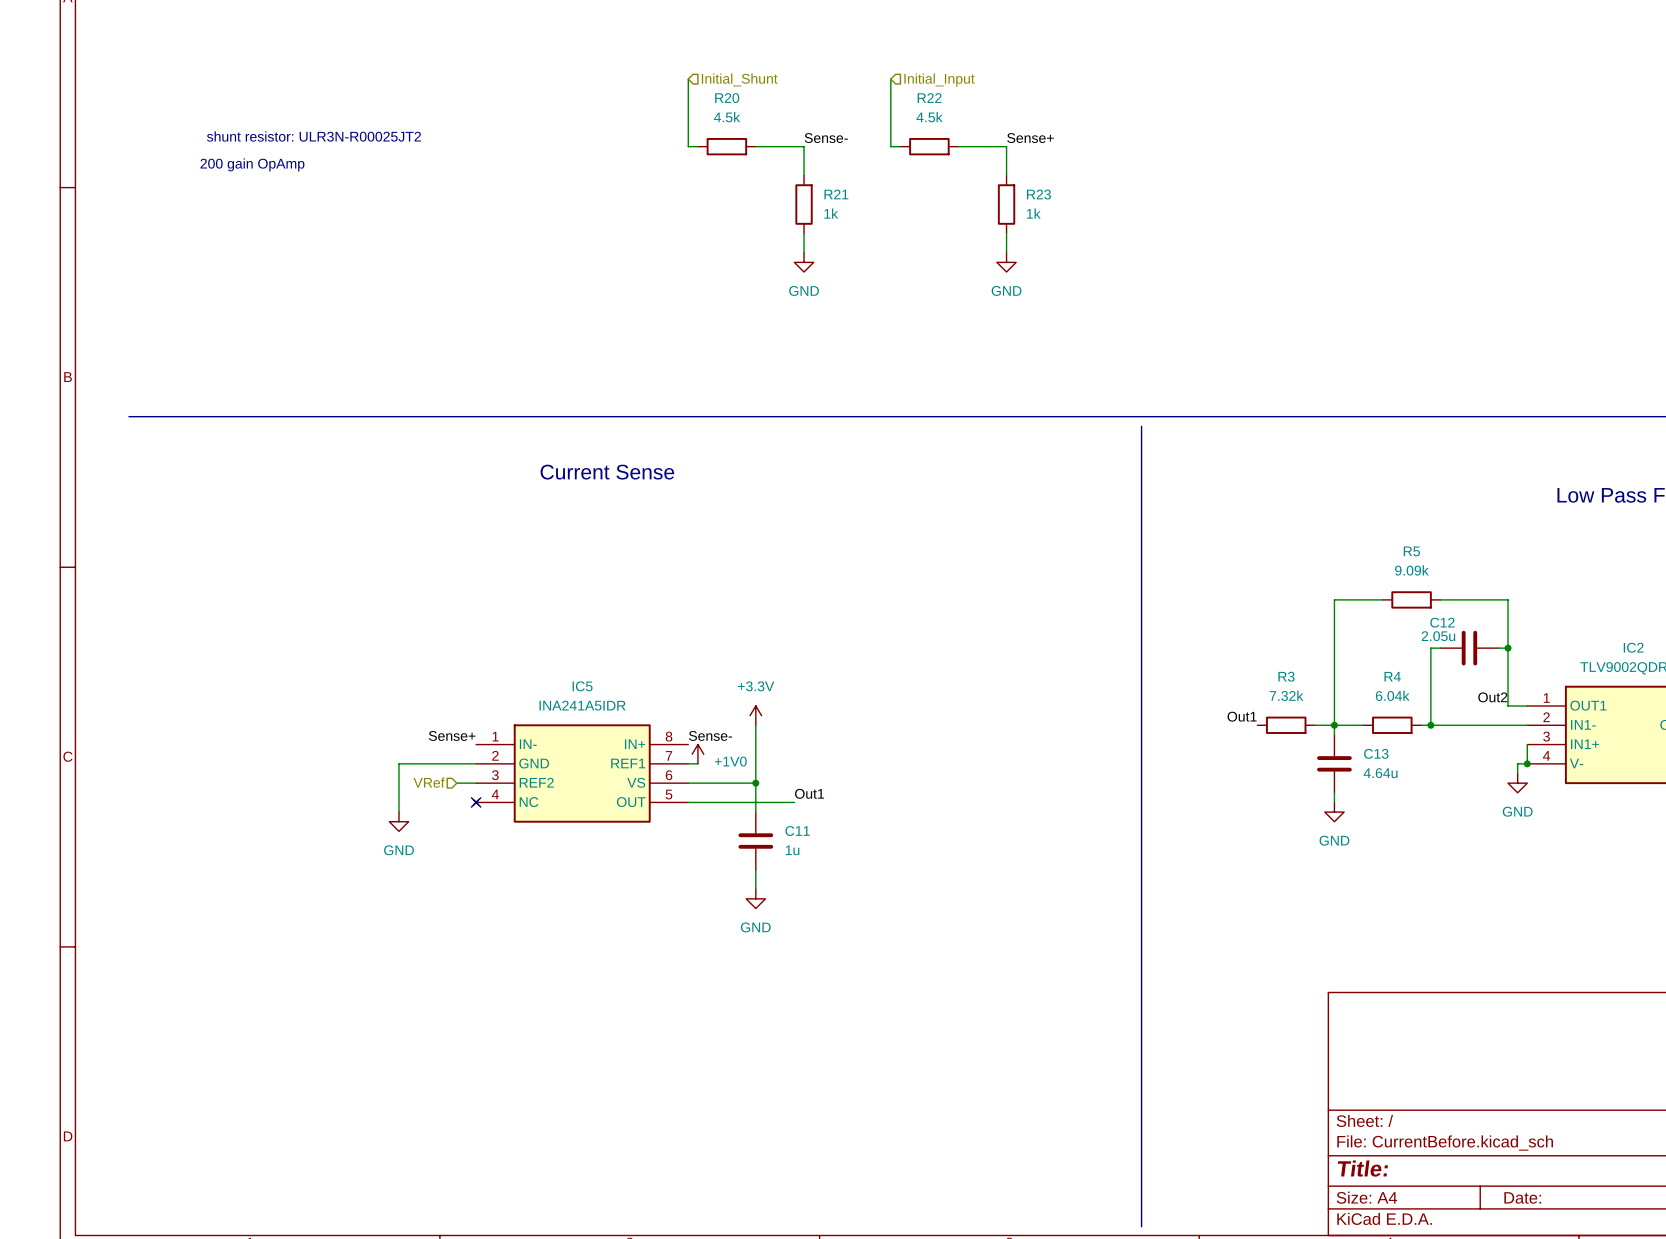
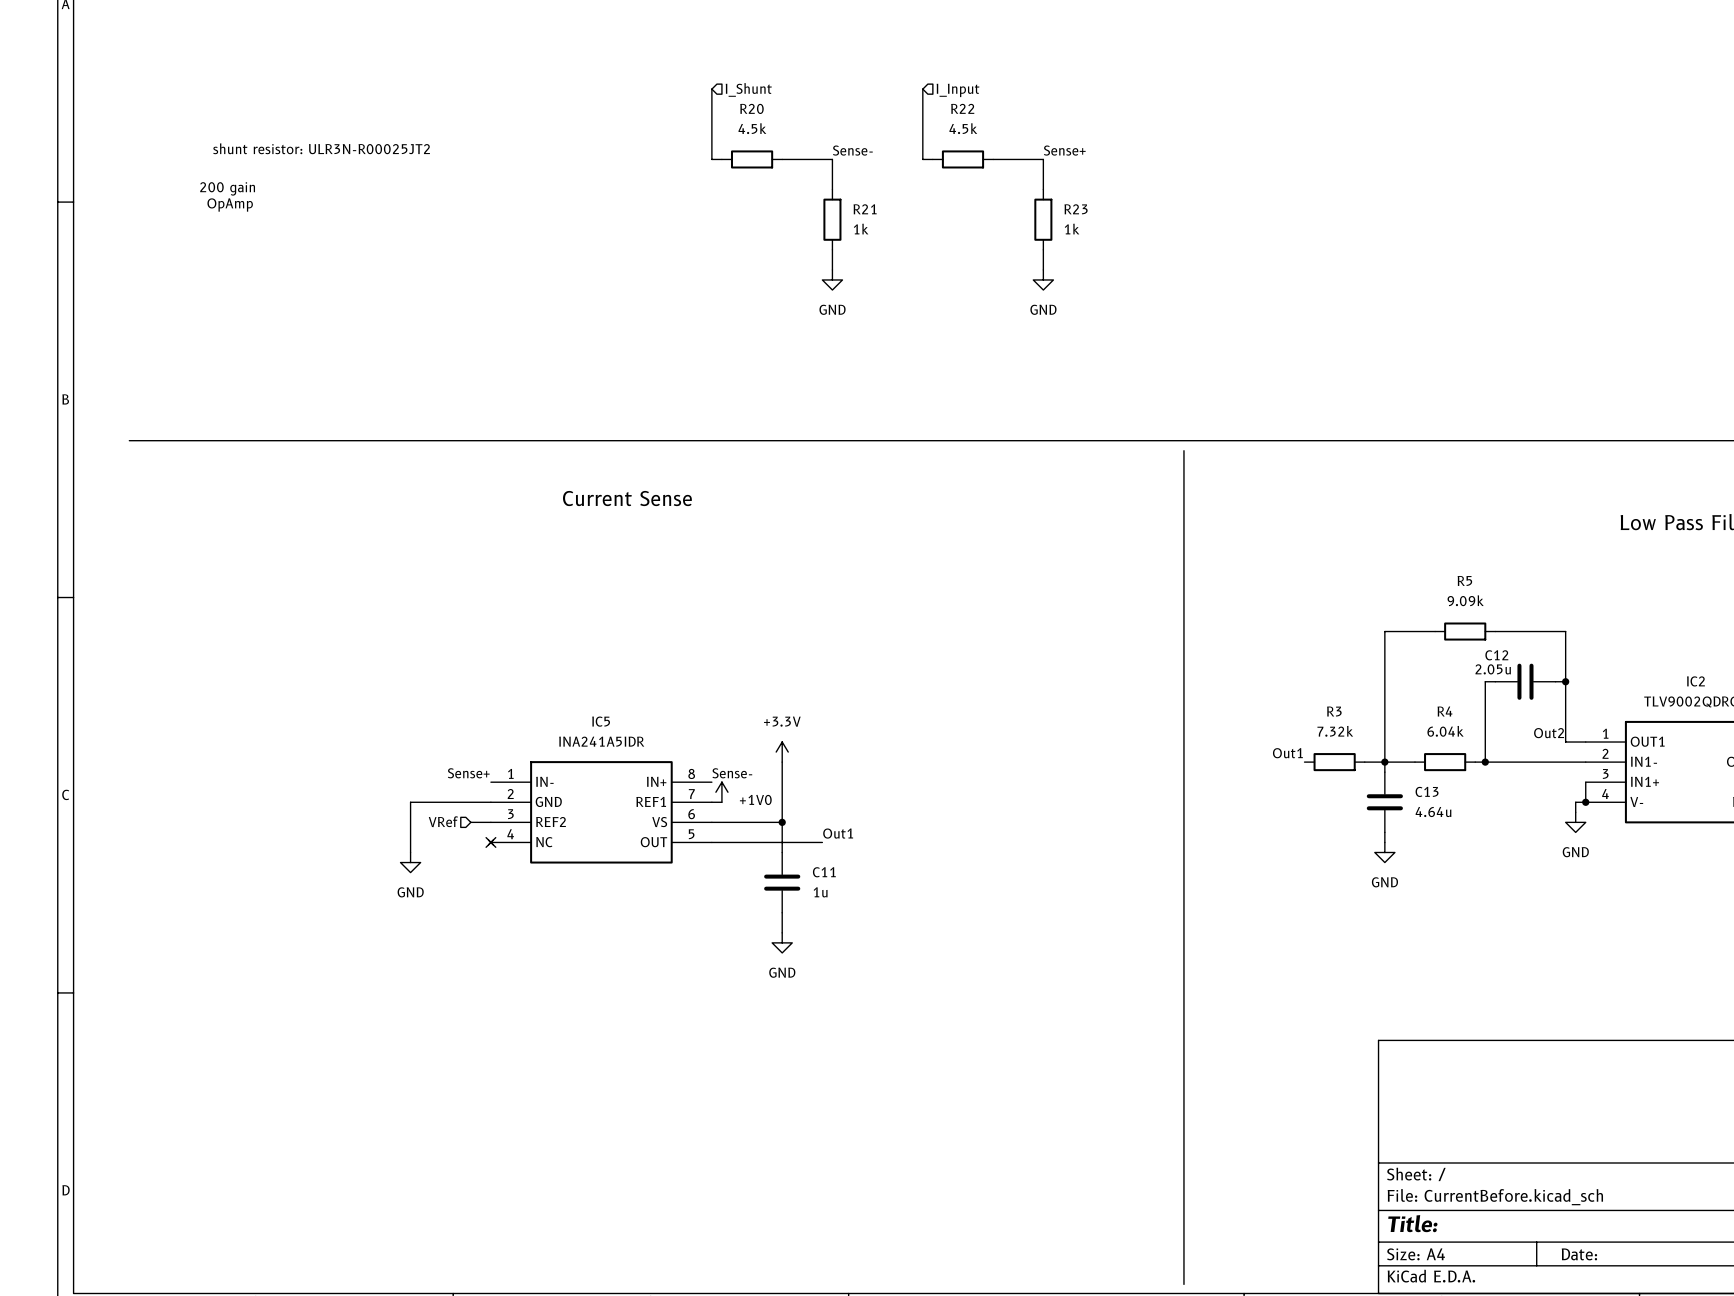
hierarchical label: Initial_Shunt (739, 79) -> I_Shunt (748, 89)
hierarchical label: Initial_Input (939, 79) -> I_Input (958, 90)
text: 200 gain OpAmp (252, 164) -> 200 gain (227, 188)
text: none -> OpAmp (230, 205)

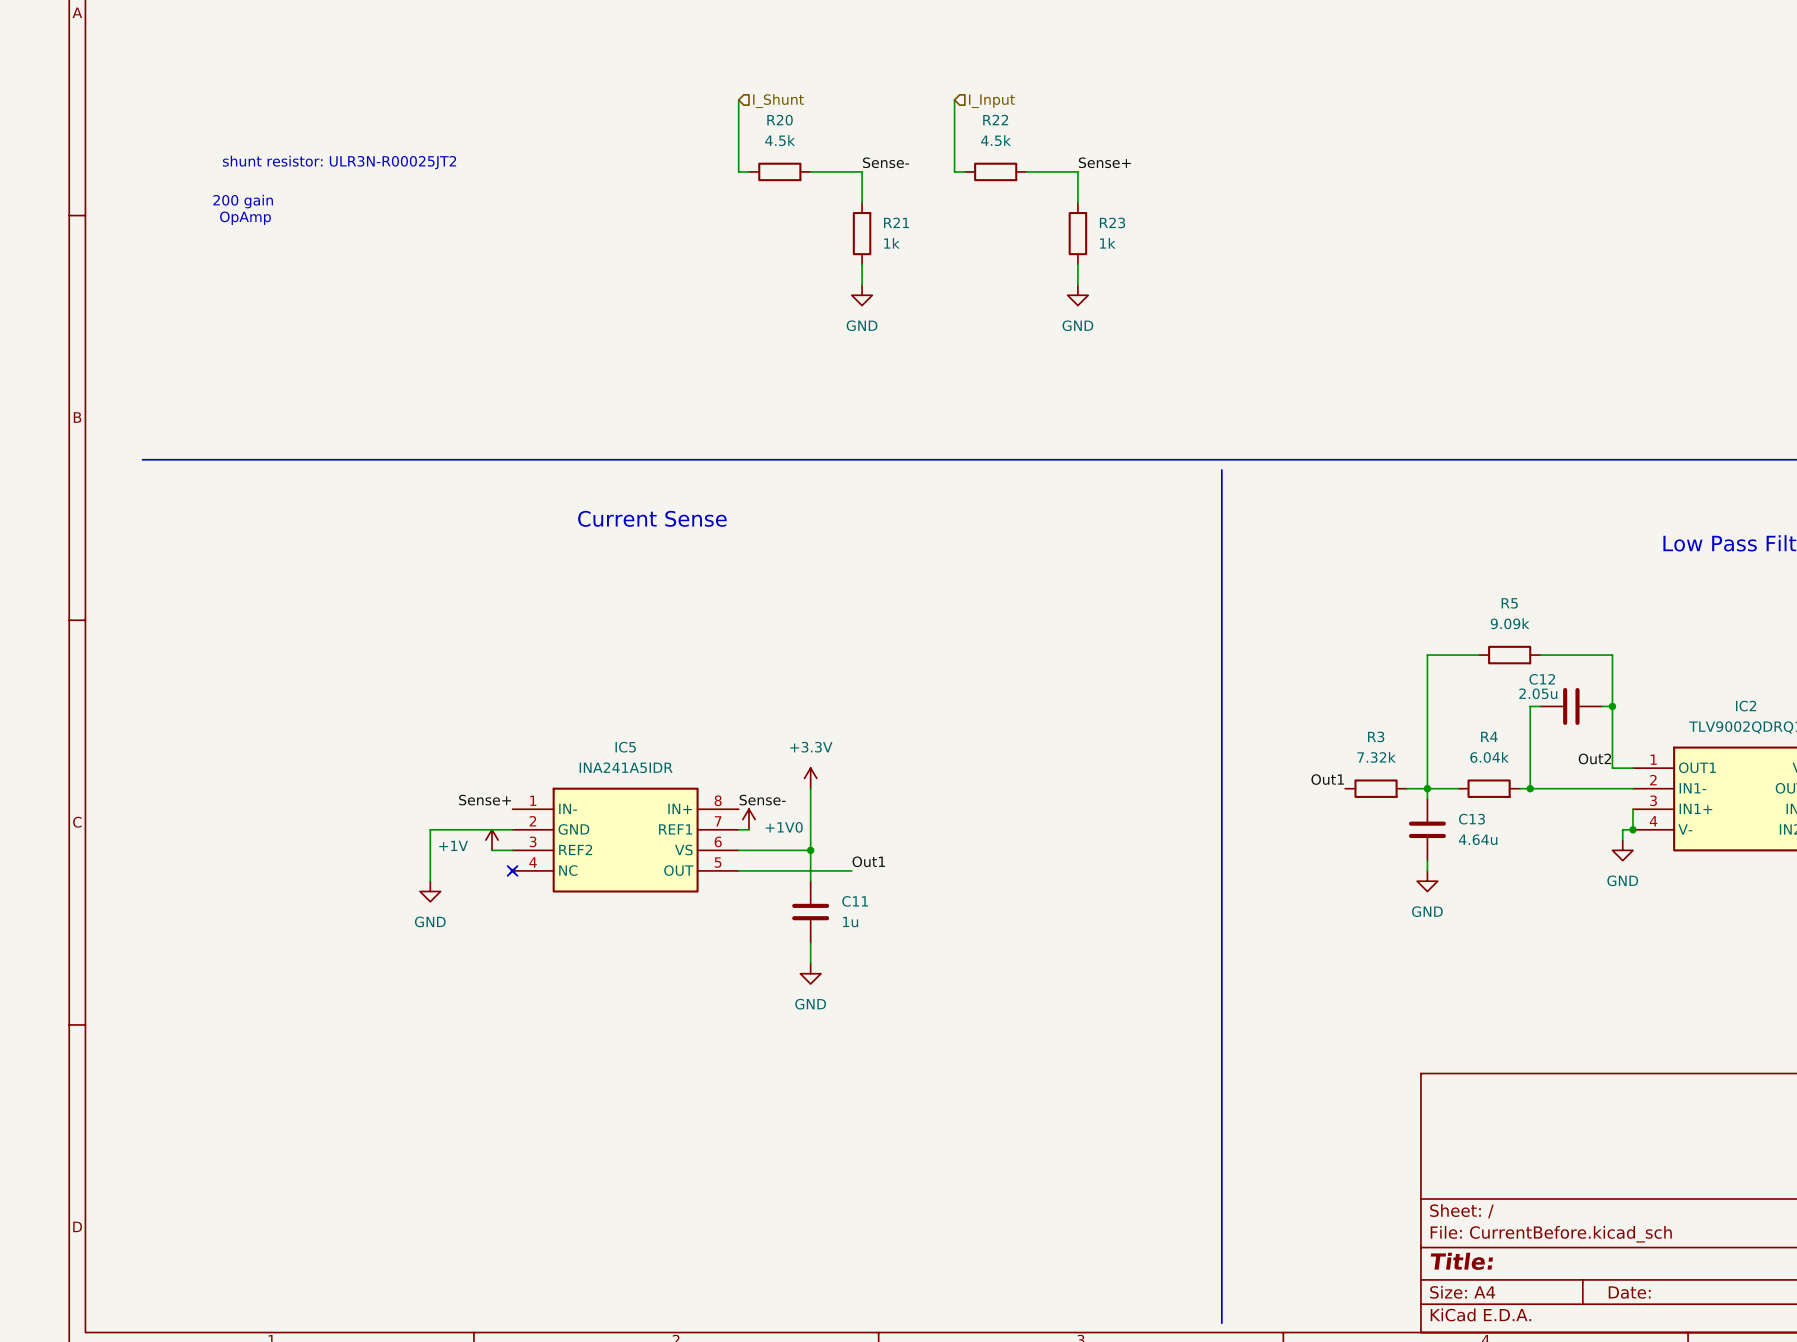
power symbol: none -> +1V (491, 840)
hierarchical label: VRef (443, 821) -> none

